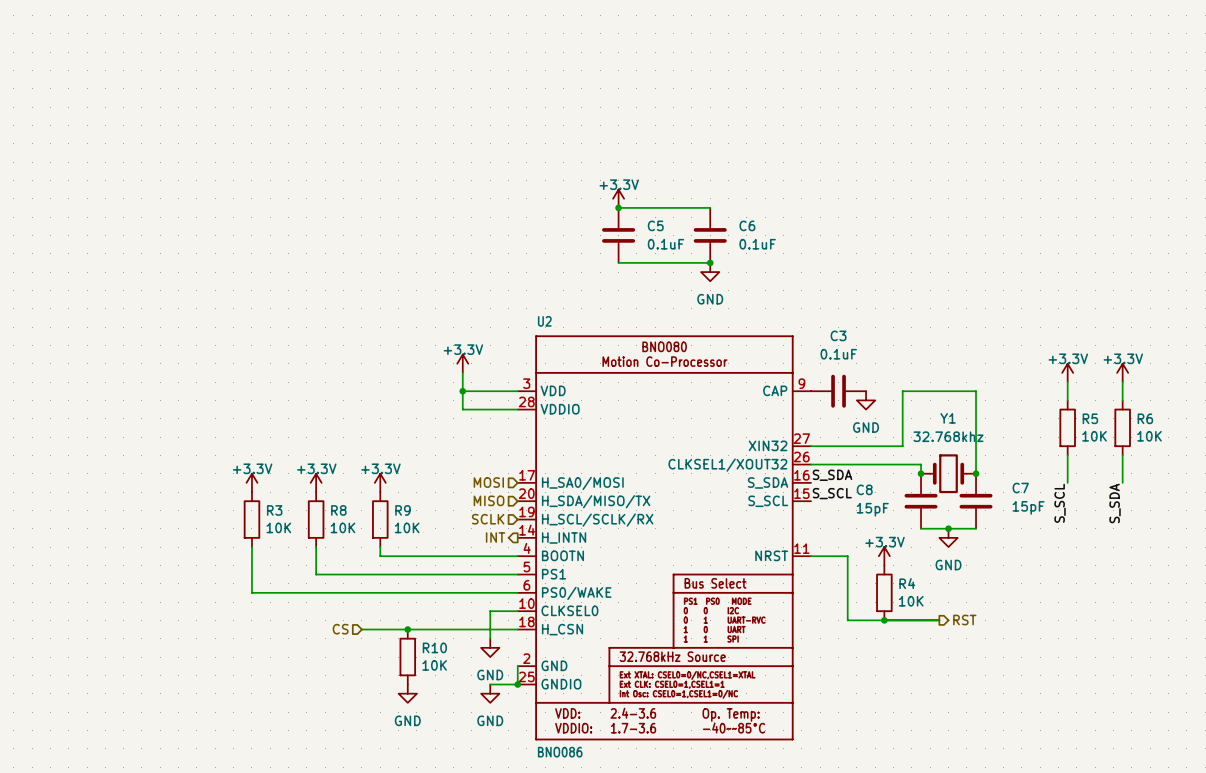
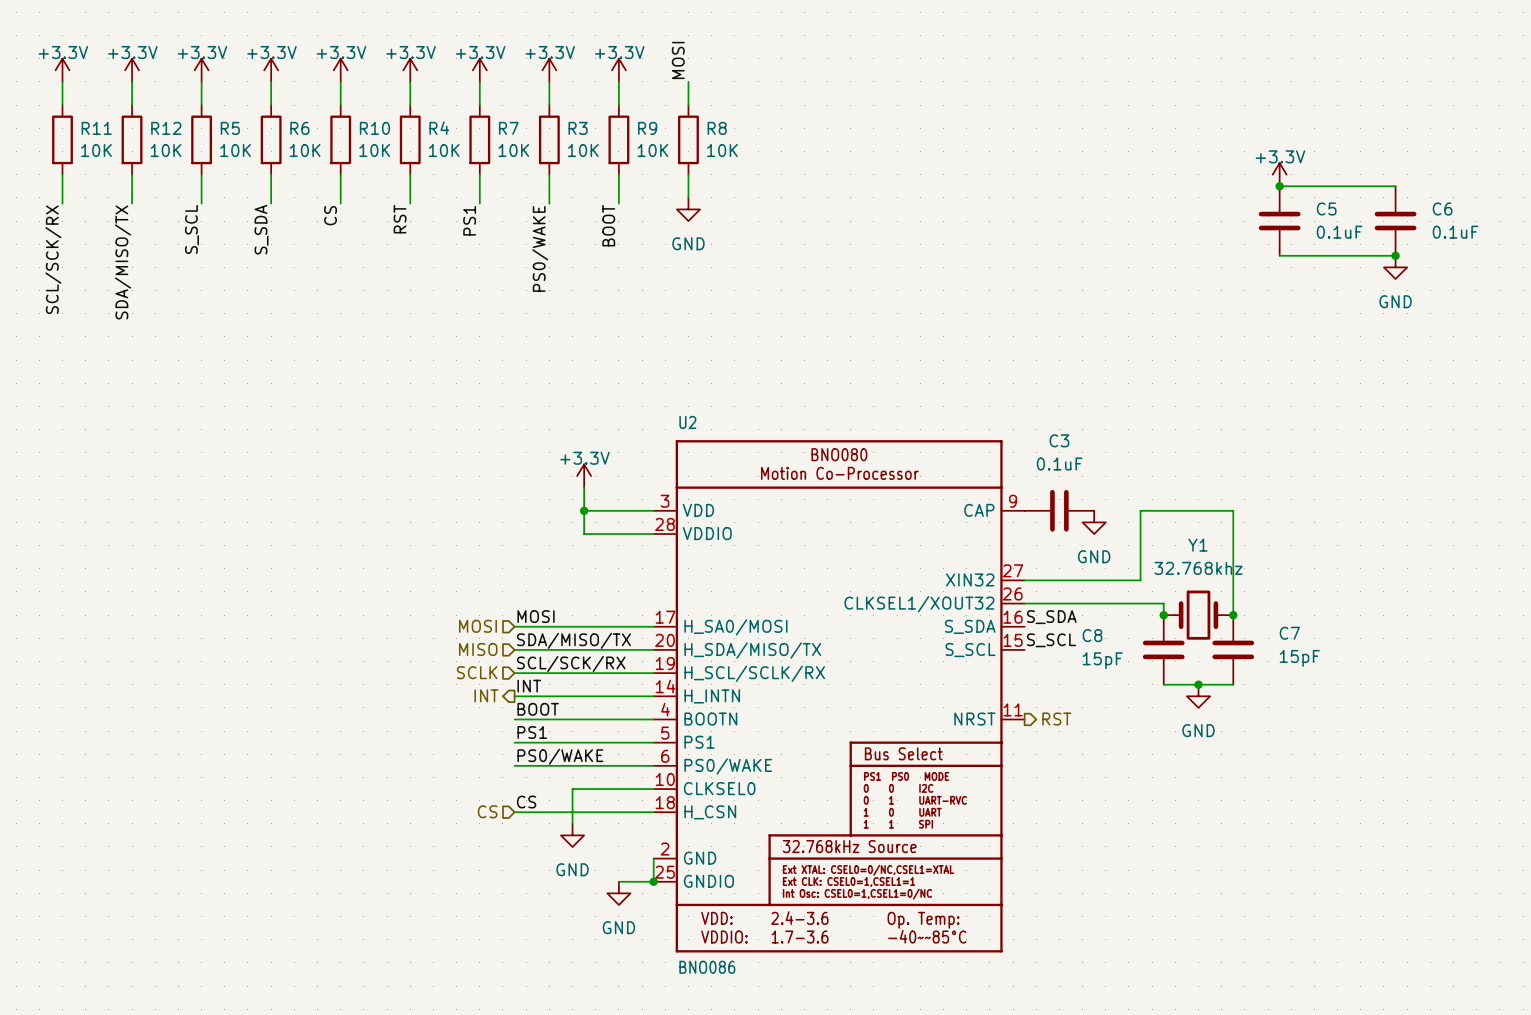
label: none -> MOSI (678, 60)
power symbol: none -> +3.3V (62, 70)
power symbol: none -> +3.3V (132, 70)
power symbol: none -> +3.3V (201, 70)
power symbol: none -> +3.3V (271, 70)
power symbol: none -> +3.3V (340, 70)
power symbol: none -> +3.3V (410, 70)
power symbol: none -> +3.3V (479, 70)
power symbol: none -> +3.3V (549, 70)
power symbol: none -> +3.3V (618, 70)
wire: none -> (62, 81) (62, 105)
wire: none -> (132, 81) (132, 105)
wire: none -> (201, 81) (201, 105)
wire: none -> (271, 81) (271, 105)
wire: none -> (340, 81) (340, 105)
wire: none -> (410, 81) (410, 105)
wire: none -> (479, 81) (479, 105)
wire: none -> (549, 81) (549, 105)
wire: none -> (618, 81) (618, 105)
wire: none -> (688, 81) (688, 105)
R11: none -> 10K (62, 139)
R12: none -> 10K (132, 139)
R7: none -> 10K (479, 139)
wire: none -> (62, 174) (62, 203)
wire: none -> (132, 174) (132, 203)
wire: none -> (201, 174) (201, 203)
wire: none -> (271, 174) (271, 203)
wire: none -> (340, 174) (340, 203)
wire: none -> (410, 174) (410, 203)
wire: none -> (479, 174) (479, 203)
wire: none -> (549, 174) (549, 203)
wire: none -> (618, 174) (618, 203)
wire: none -> (688, 174) (688, 197)
power symbol: none -> +3.3V (1279, 174)
wire: none -> (1279, 186) (1395, 186)
junction: none -> (1279, 186)
power symbol: none -> GND (688, 209)
label: none -> CS (330, 215)
label: none -> RST (400, 219)
label: none -> PS1 (469, 220)
label: none -> BOOT (608, 225)
label: none -> S_SCL (191, 229)
label: none -> S_SDA (261, 229)
label: none -> PS0/WAKE (540, 248)
wire: none -> (1279, 255) (1395, 255)
junction: none -> (1395, 255)
label: none -> SCL/SCK/RX (53, 259)
label: none -> SDA/MISO/TX (122, 262)
power symbol: +3.3V (618, 198) -> none
power symbol: none -> GND (1395, 267)
wire: (618, 207) (710, 207) -> none
junction: (618, 207) -> none
C5 position: (618, 235) -> (1279, 221)
C6 position: (710, 235) -> (1395, 221)
wire: (618, 262) (710, 262) -> none
junction: (710, 262) -> none
power symbol: GND (710, 272) -> none
power symbol: +3.3V (1067, 372) -> none
power symbol: +3.3V (1122, 372) -> none
wire: (1067, 382) (1067, 400) -> none
wire: (1122, 382) (1122, 400) -> none
R5 position: (1067, 427) -> (201, 139)
R6 position: (1122, 427) -> (271, 139)
wire: (1067, 455) (1067, 482) -> none
wire: (1122, 455) (1122, 482) -> none
label: none -> MOSI (536, 616)
power symbol: +3.3V (251, 482) -> none
power symbol: +3.3V (316, 482) -> none
power symbol: +3.3V (380, 482) -> none
wire: none -> (514, 626) (653, 626)
hierarchical label position: MOSI (488, 482) -> MOSI (477, 626)
label: none -> SDA/MISO/TX (573, 640)
hierarchical label position: MISO (489, 500) -> MISO (478, 649)
wire: none -> (514, 649) (653, 649)
label: S_SCL (1060, 503) -> none
label: S_SDA (1115, 503) -> none
label: none -> SCL/SCK/RX (571, 664)
R3 position: (251, 519) -> (549, 139)
R8 position: (316, 519) -> (688, 139)
R9 position: (380, 519) -> (618, 139)
wire: none -> (514, 673) (653, 673)
hierarchical label position: SCLK (488, 519) -> SCLK (477, 672)
label: none -> INT (529, 686)
wire: none -> (514, 696) (653, 696)
hierarchical label position: INT (495, 537) -> INT (486, 695)
wire: (251, 547) (251, 592) (407, 592) -> none
wire: (316, 547) (316, 574) (407, 574) -> none
wire: (380, 547) (380, 556) (407, 556) -> none
label: none -> BOOT (538, 709)
wire: (811, 556) (847, 556) (847, 620) (939, 620) -> none
power symbol: +3.3V (884, 556) -> none
label: none -> PS1 (532, 732)
label: none -> PS0/WAKE (560, 756)
R4 position: (884, 592) -> (410, 139)
wire: (490, 611) (490, 638) -> (618, 789) (572, 789) (572, 823)
junction: (884, 620) -> none
hierarchical label position: RST (964, 620) -> RST (1056, 719)
label: none -> CS (526, 802)
hierarchical label position: CS (340, 629) -> CS (487, 811)
wire: (361, 629) (407, 629) -> none
junction: (407, 629) -> none
power symbol: none -> GND (572, 835)
power symbol: GND (490, 647) -> none
R10 position: (407, 657) -> (340, 139)
power symbol: GND (407, 693) -> none

